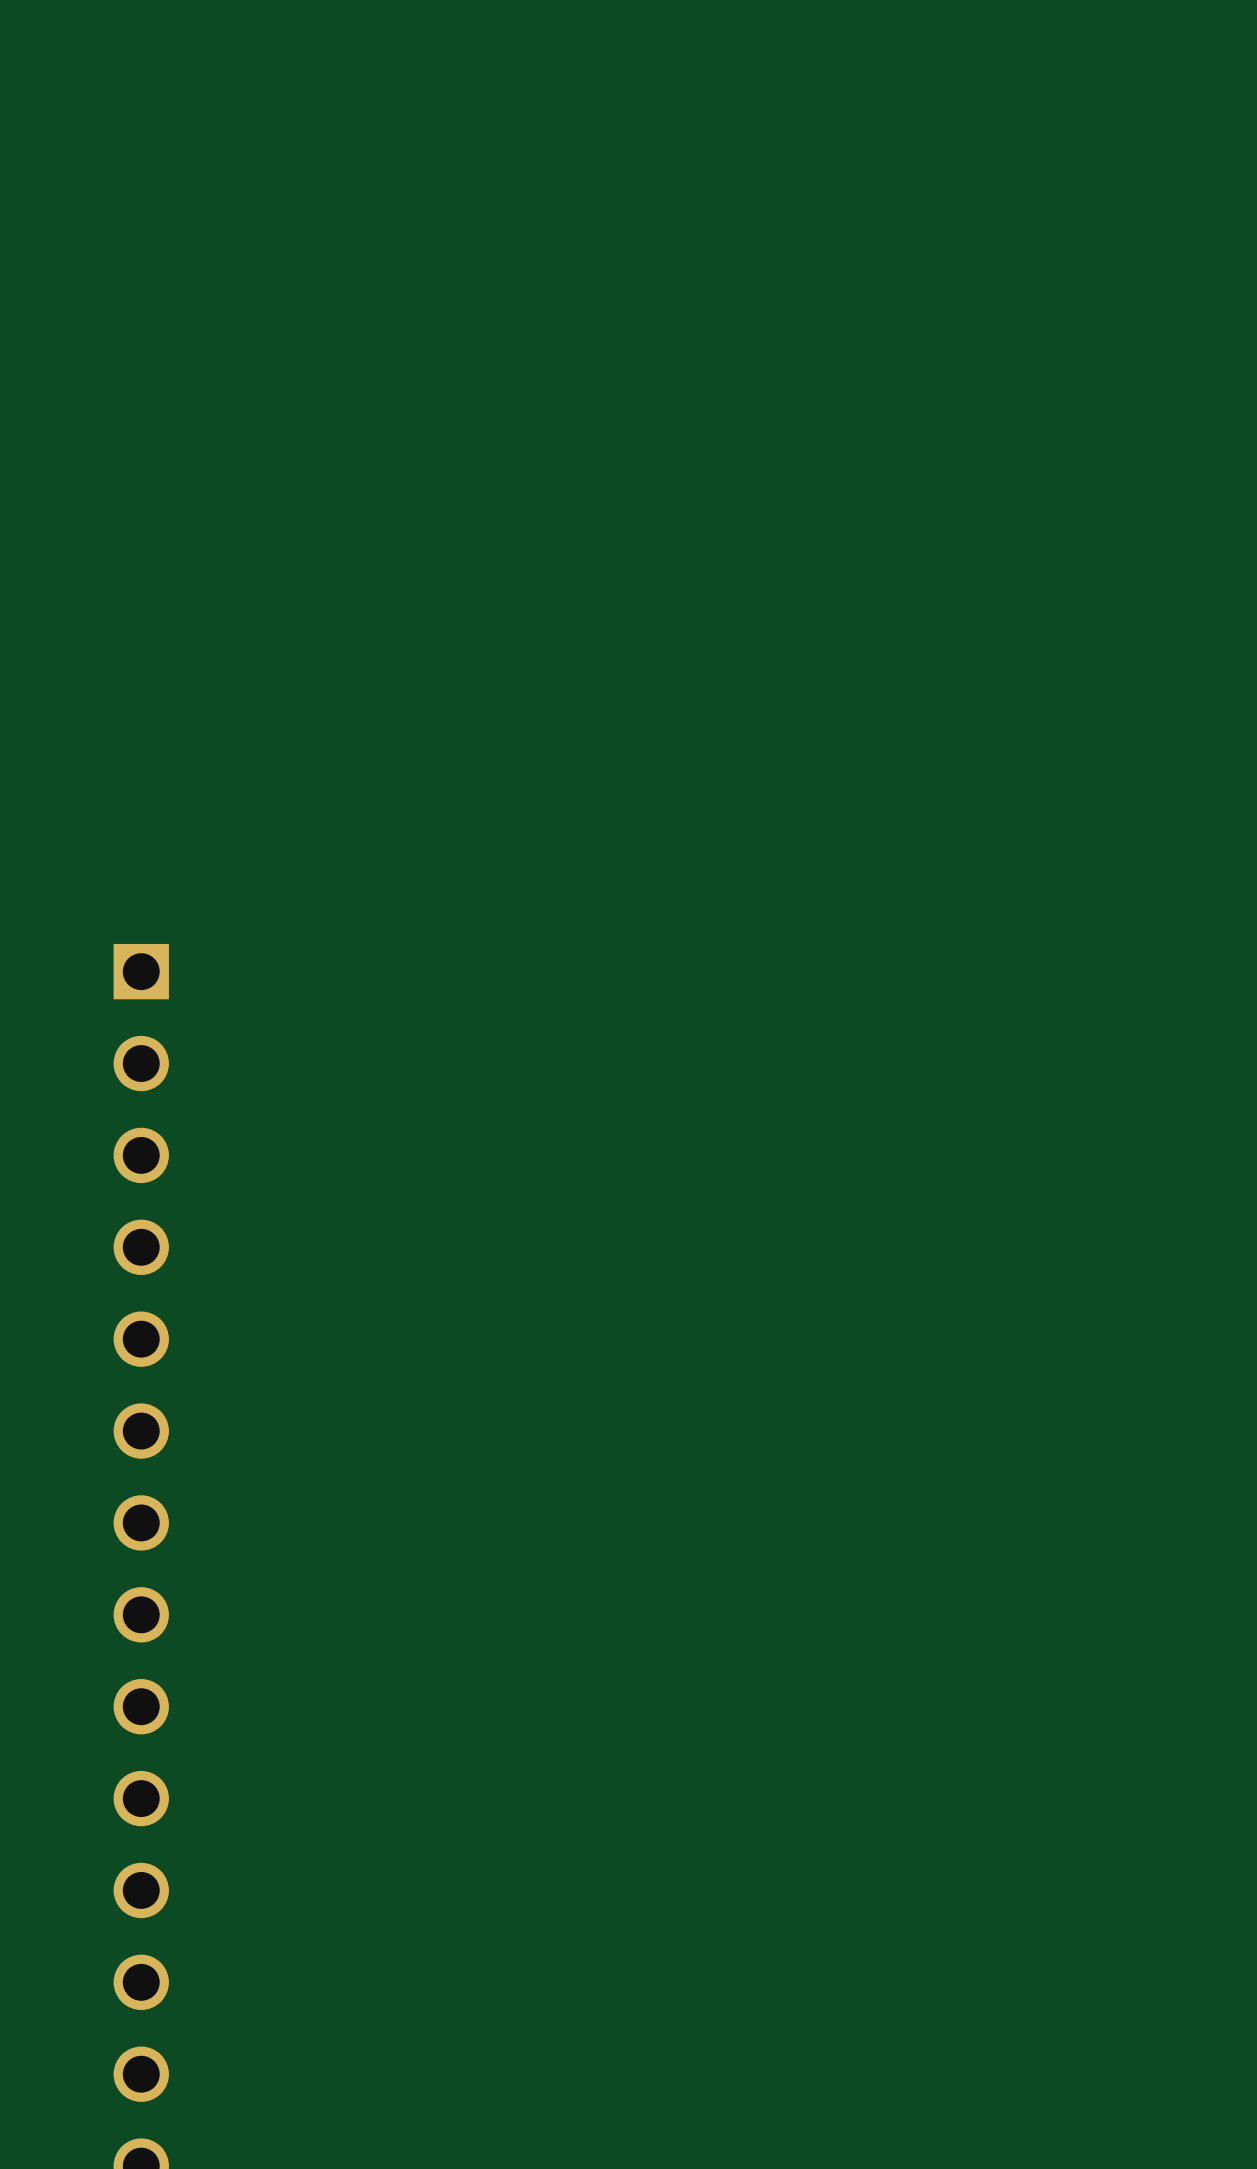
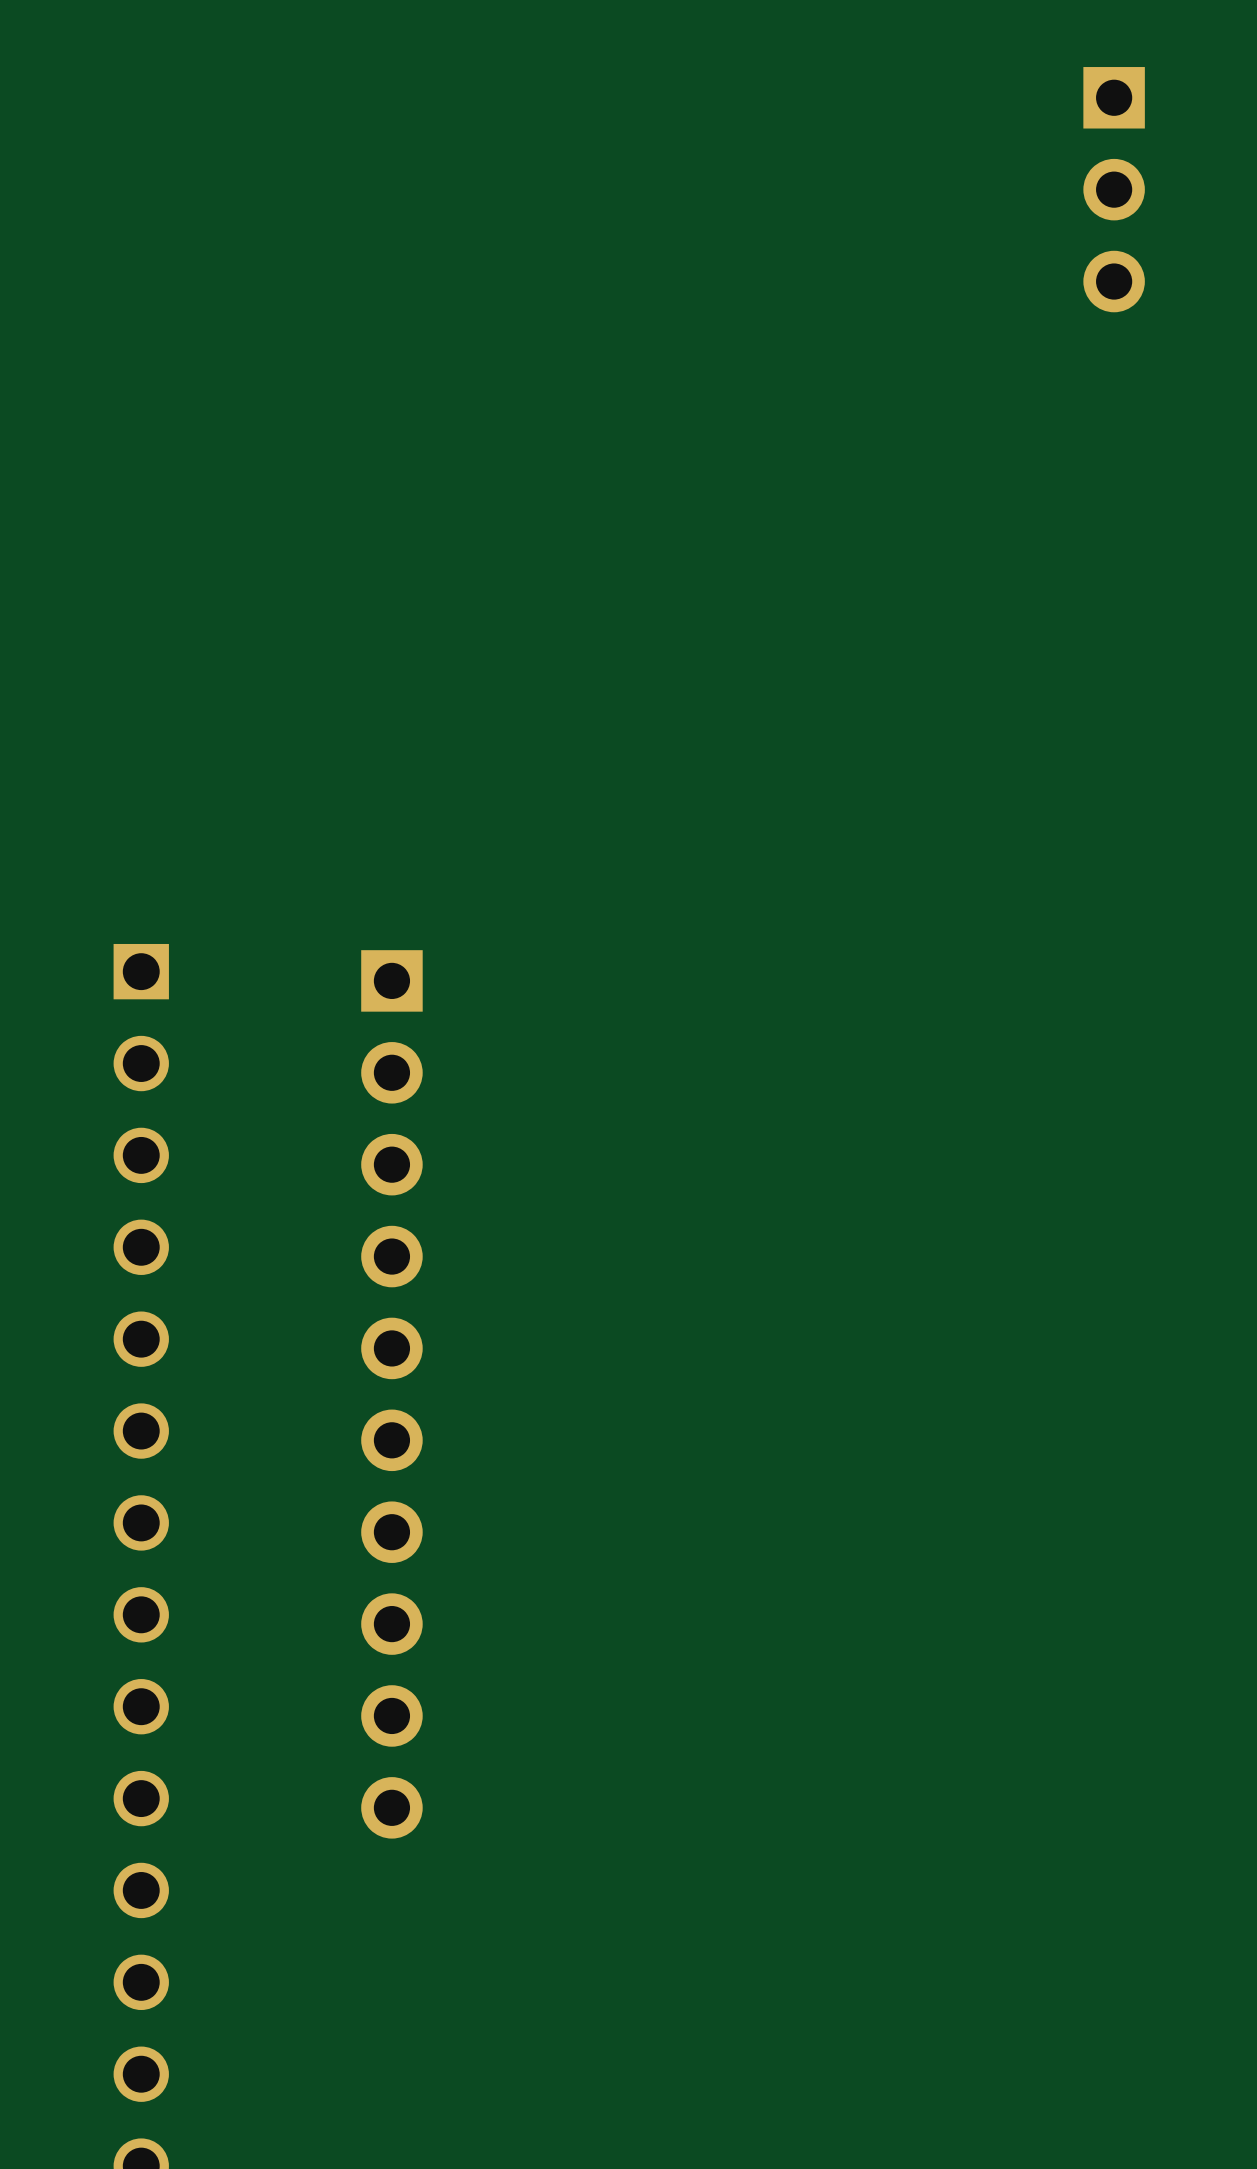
part: none -> (1114, 189)
part: none -> (391, 1394)

